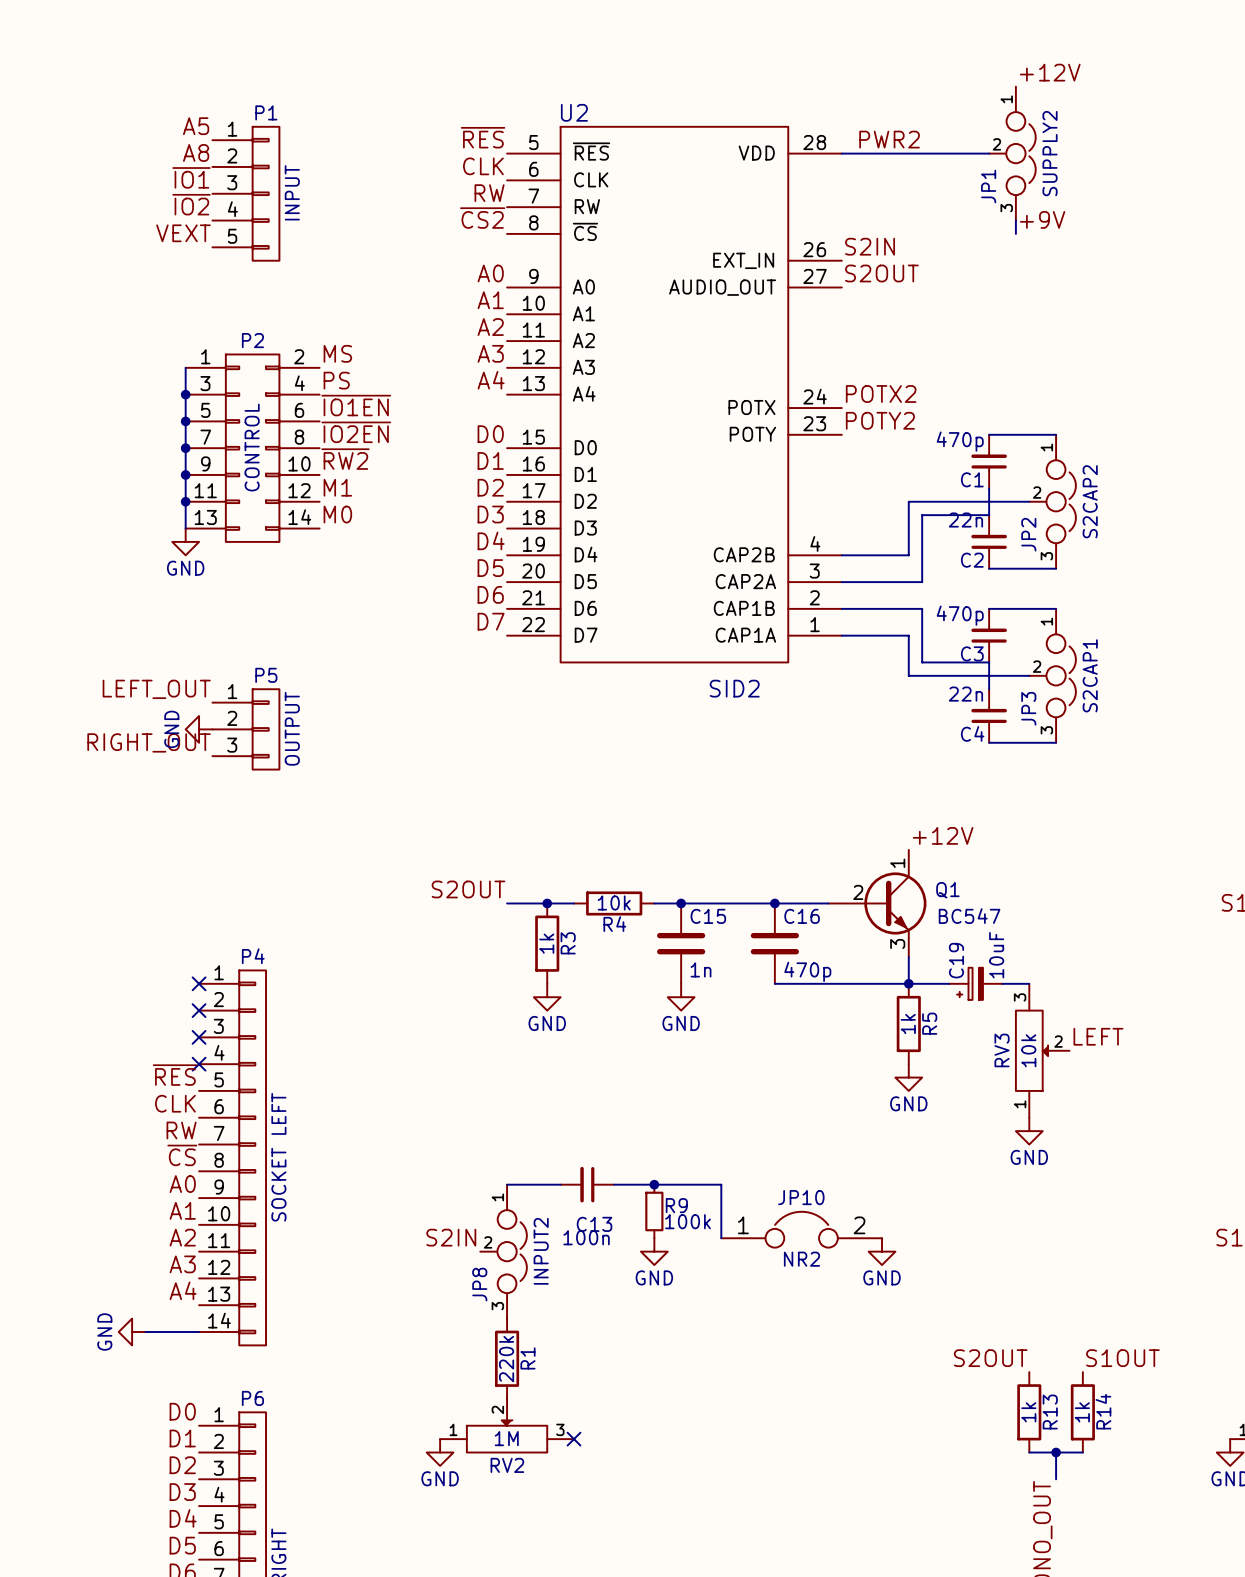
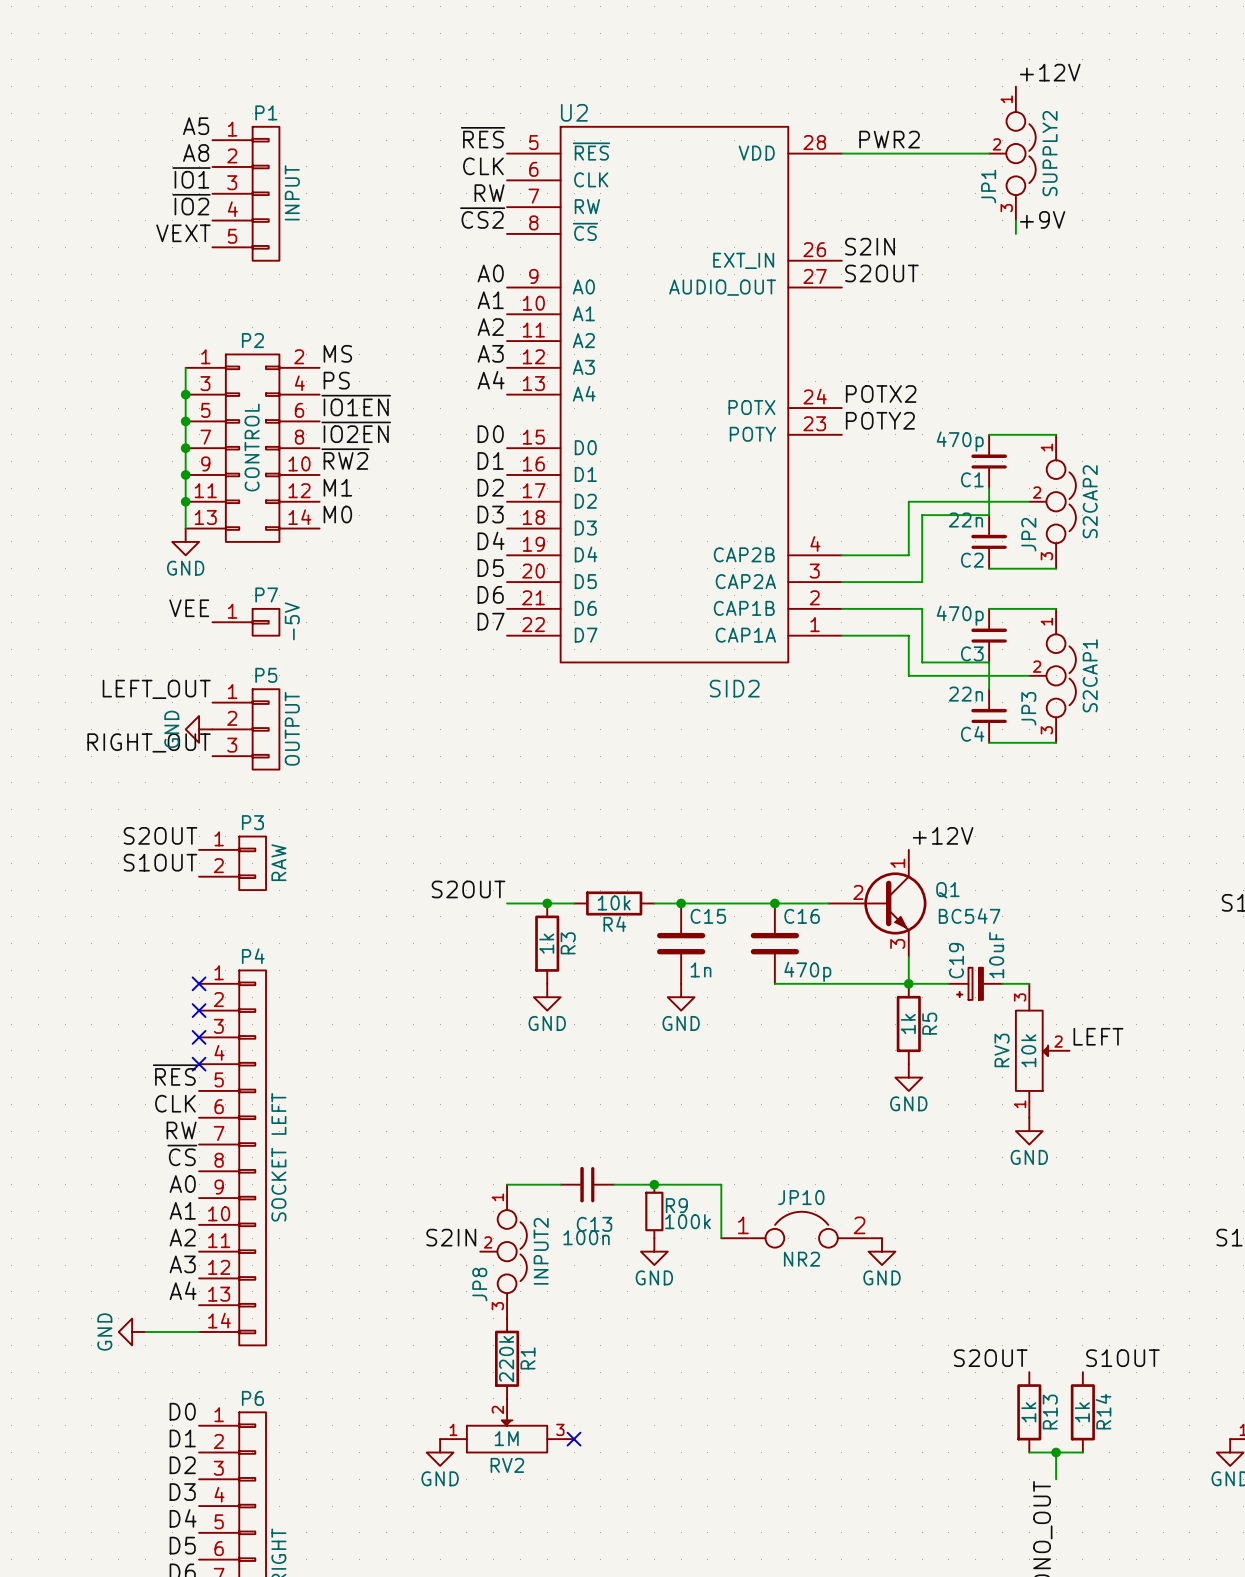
label: none -> VEE (189, 608)
P7: none -> -5V (245, 622)
label: none -> S2OUT (160, 835)
label: none -> S1OUT (160, 862)
P3: none -> RAW (232, 863)

